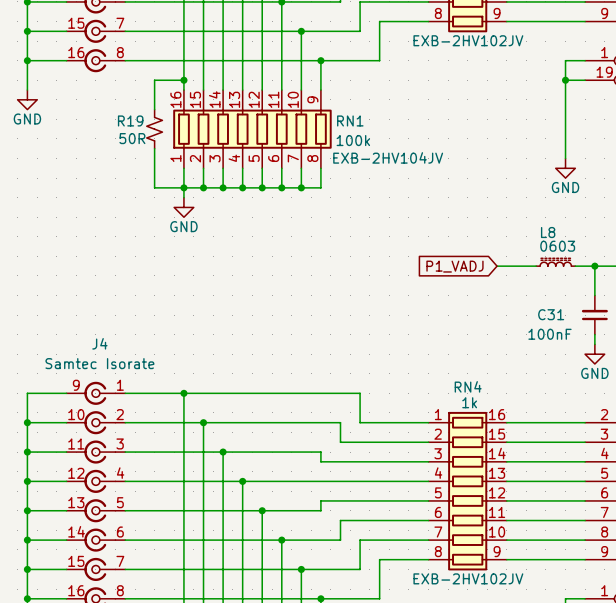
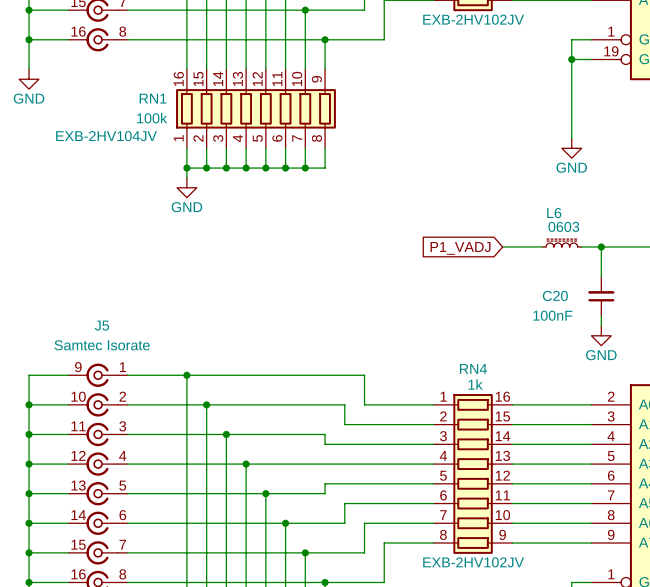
wire: (183, 80) (154, 80) (154, 109) -> none
junction: (183, 80) -> none
RN1 name position: RN1 (350, 120) -> RN1 (153, 98)
R19: 50R (154, 129) -> none
RN1 value position: 100k (353, 140) -> 100k (152, 118)
wire: (154, 148) (154, 187) (183, 187) -> none
RN1 text position: EXB-2HV104JV (388, 157) -> EXB-2HV104JV (106, 136)
L8 name: L8 (548, 232) -> L6 (554, 213)
C31 name: C31 (551, 314) -> C20 (555, 295)
J4 name: J4 (99, 343) -> J5 (101, 325)

